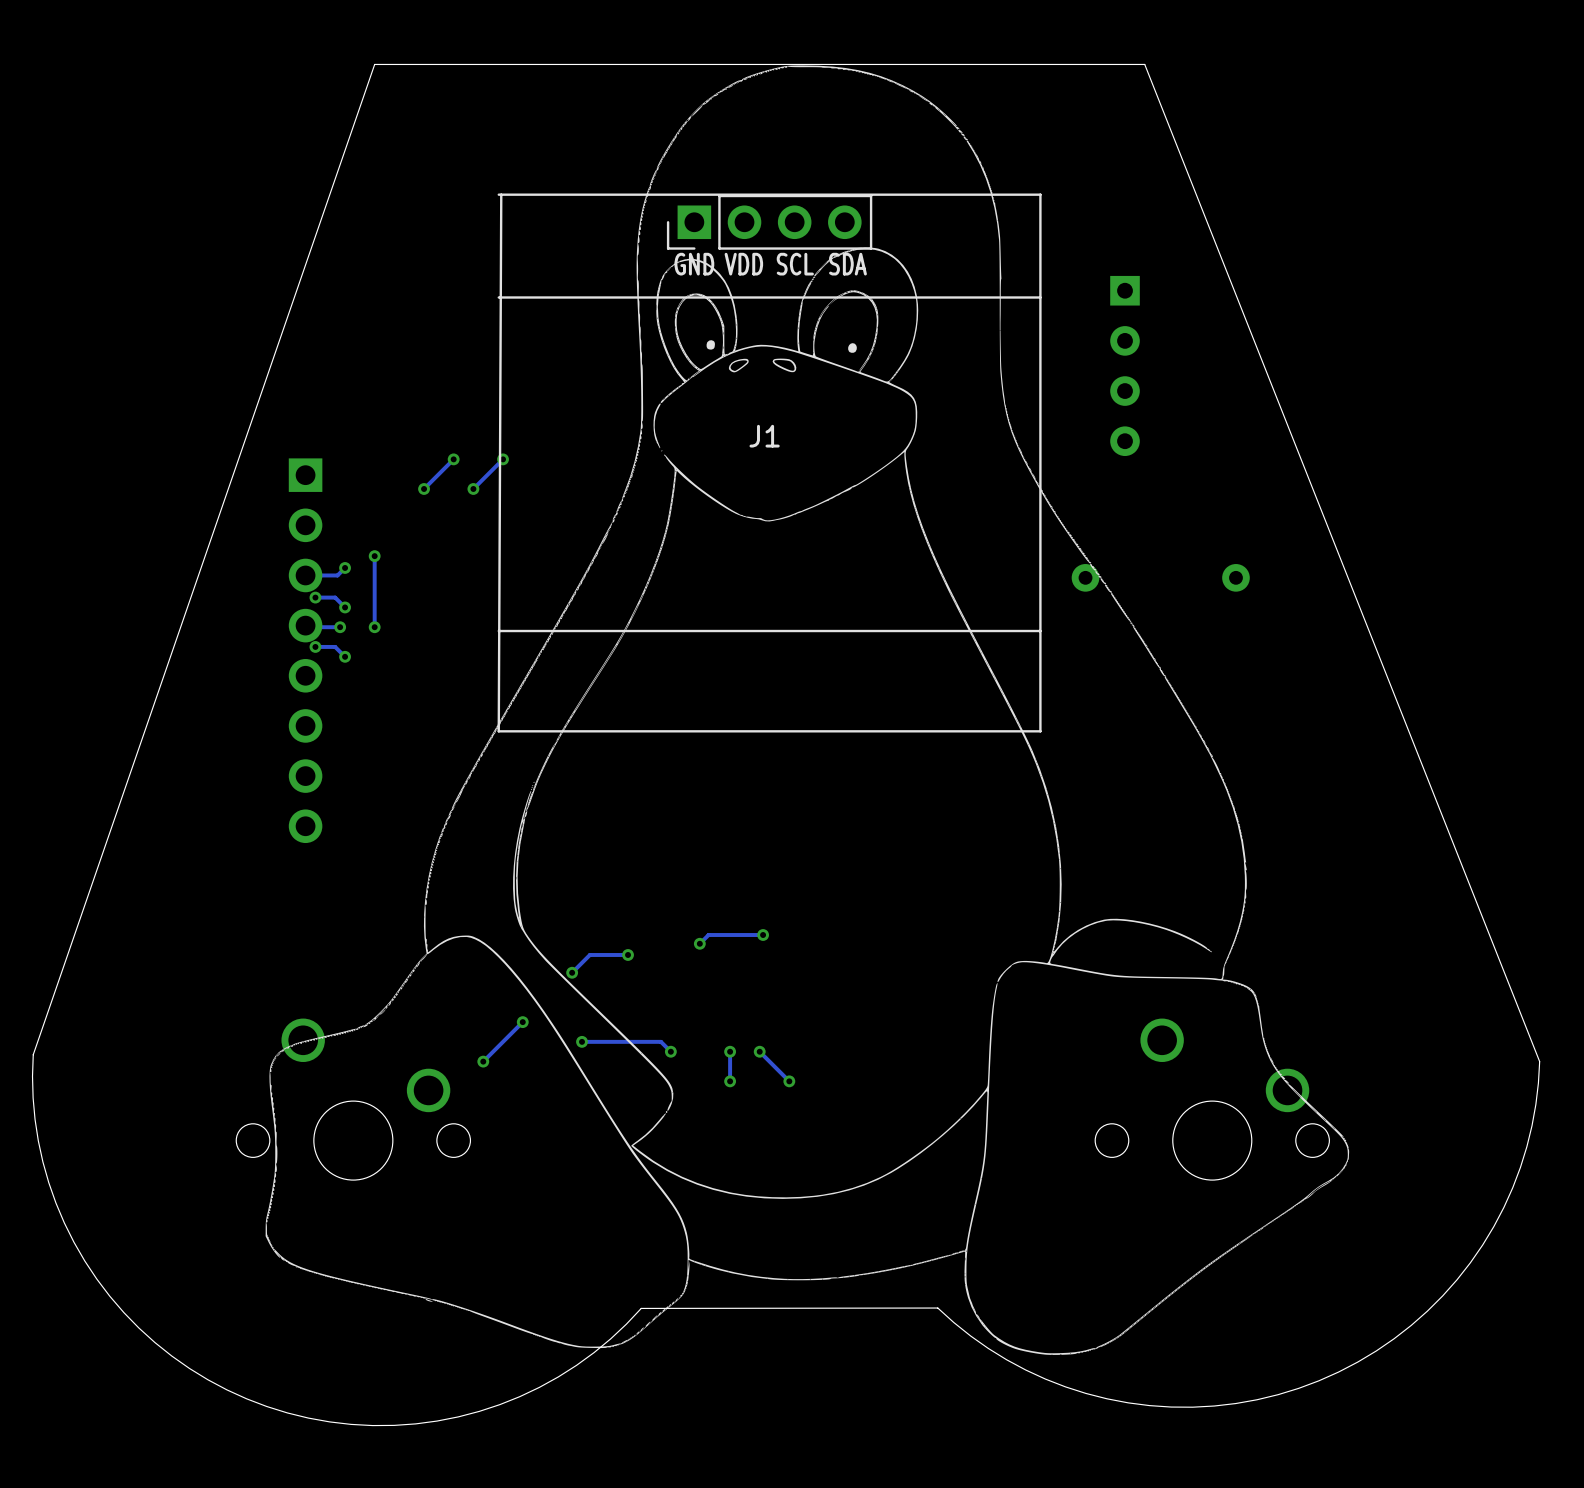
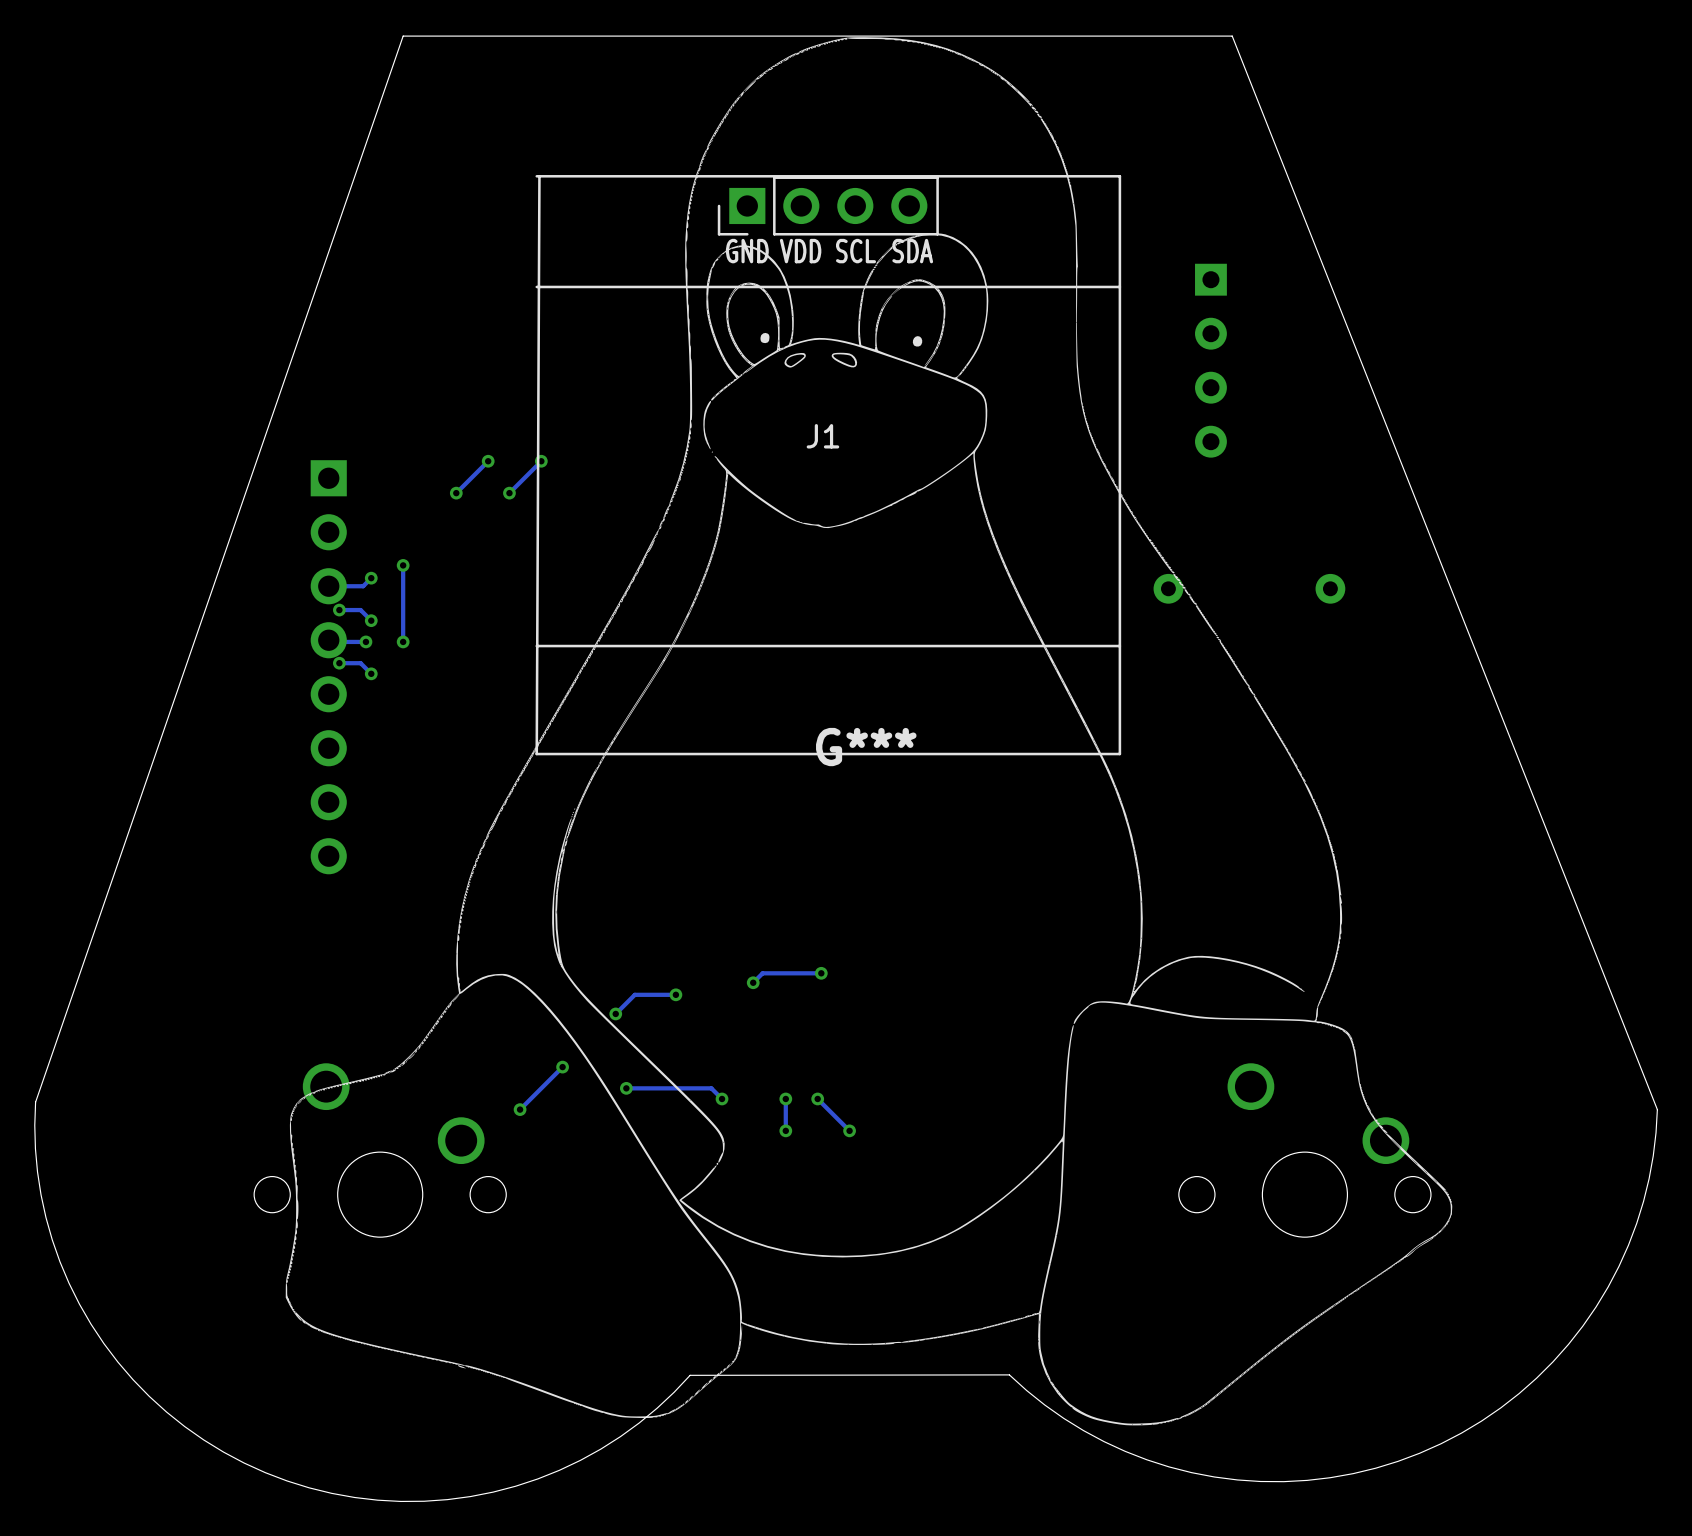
G***: none -> (869, 731)

